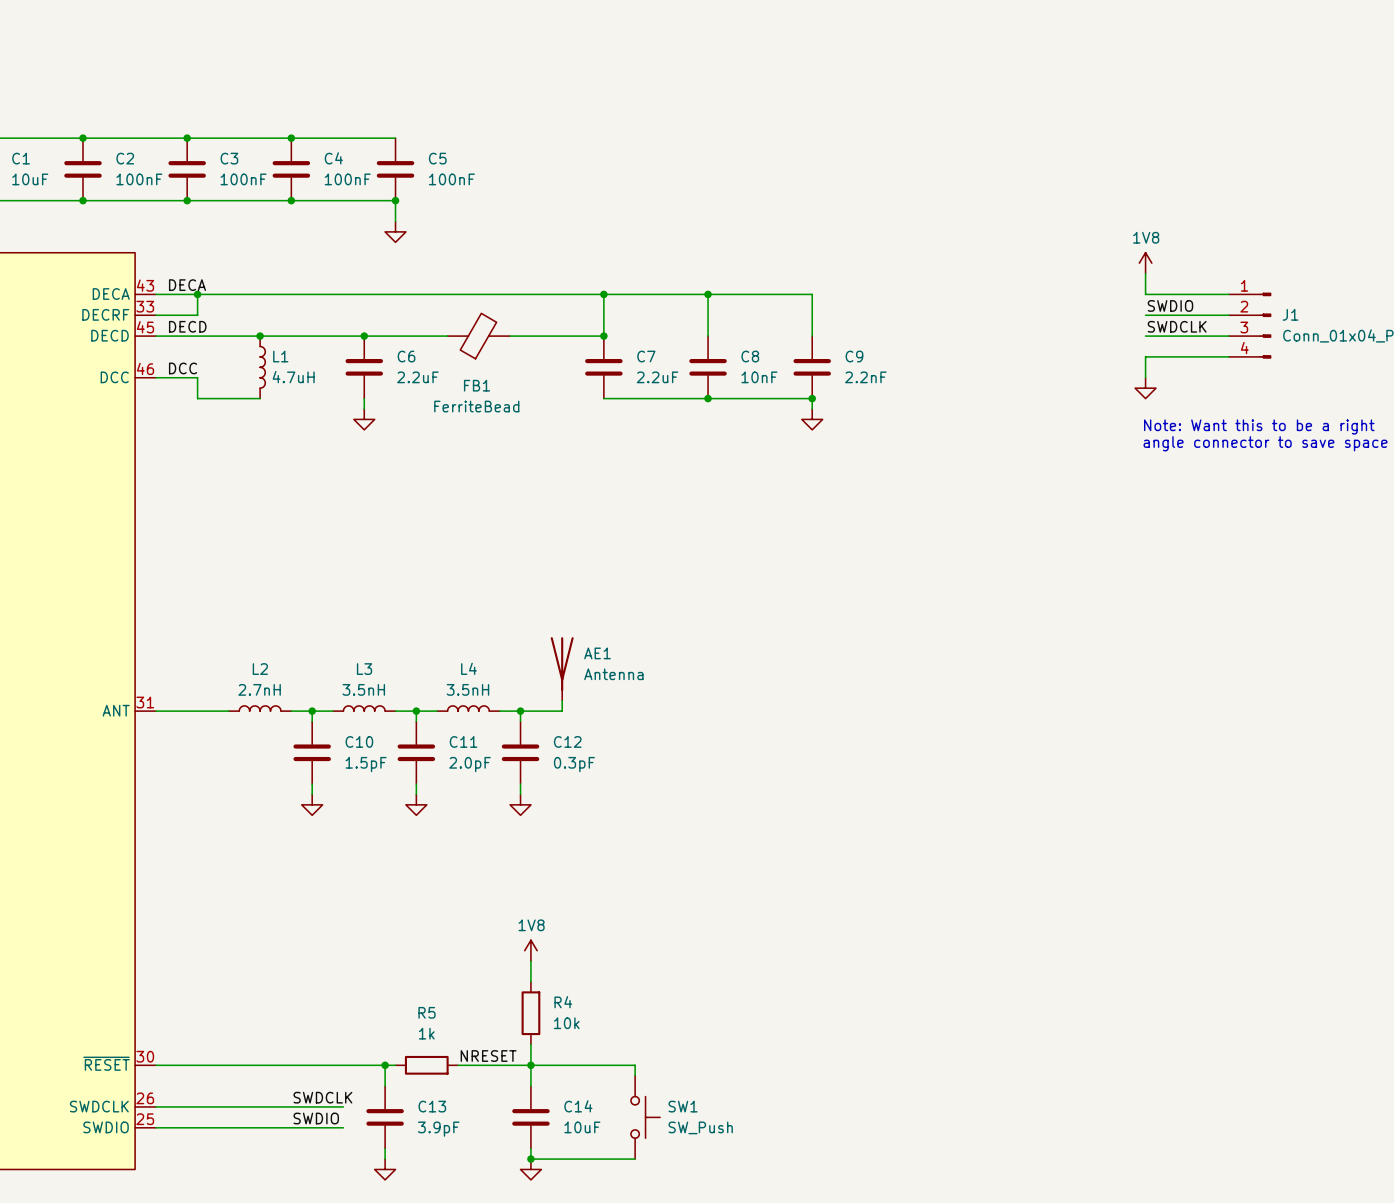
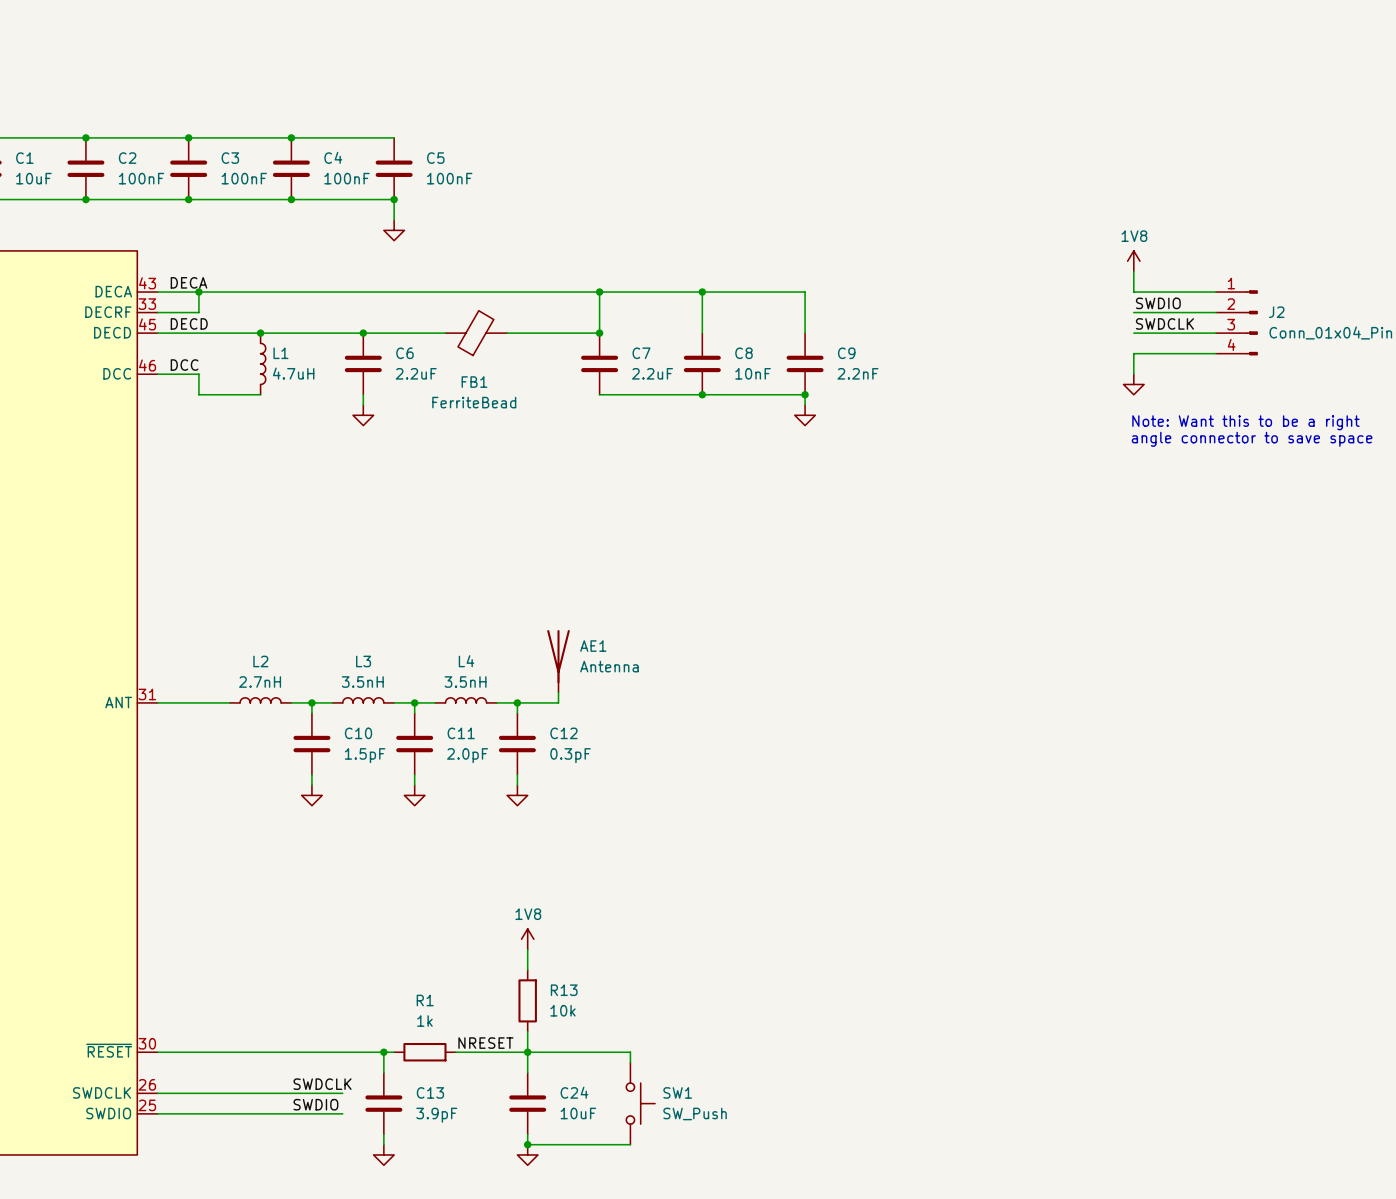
J1 name: J1 (1290, 314) -> J2 (1276, 312)
R4 name: R4 (563, 1002) -> R13 (564, 990)
R5 name: R5 (427, 1012) -> R1 (425, 1000)
C14 name: C14 (578, 1106) -> C24 (574, 1092)

